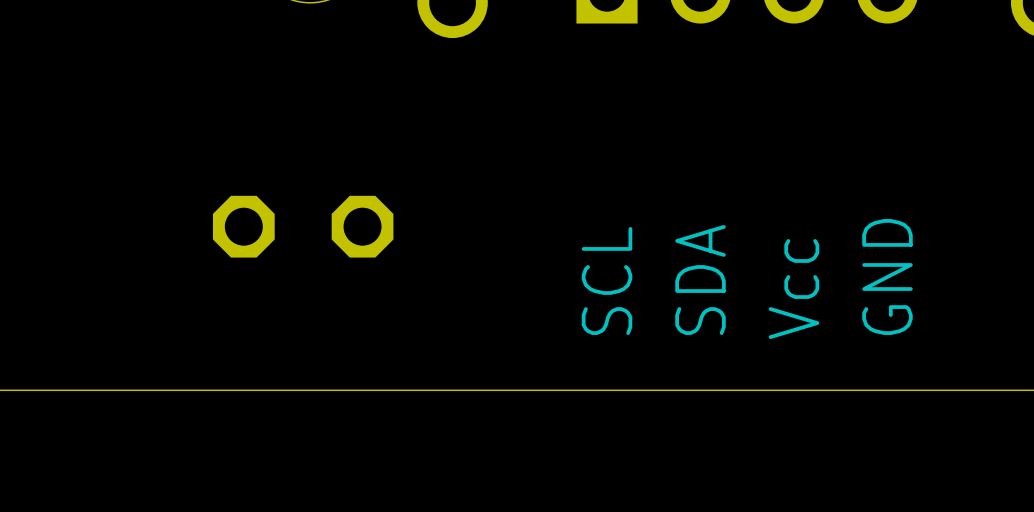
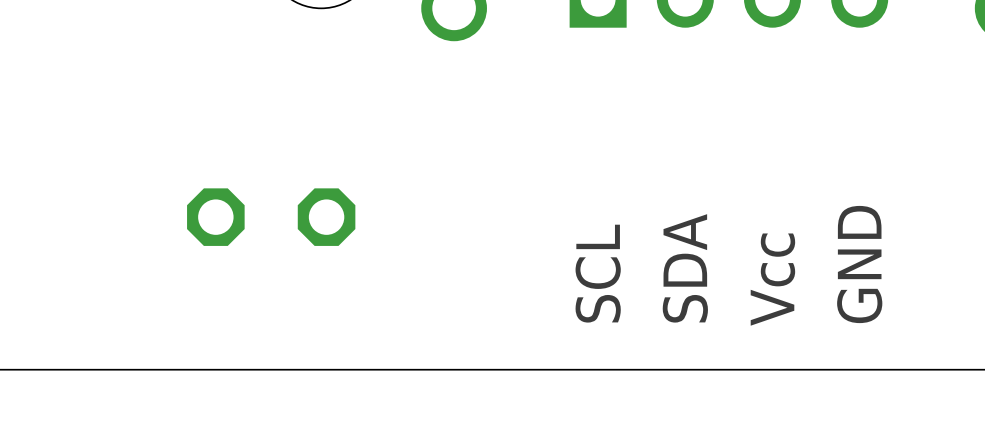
part position: (303, 226) -> (271, 217)

